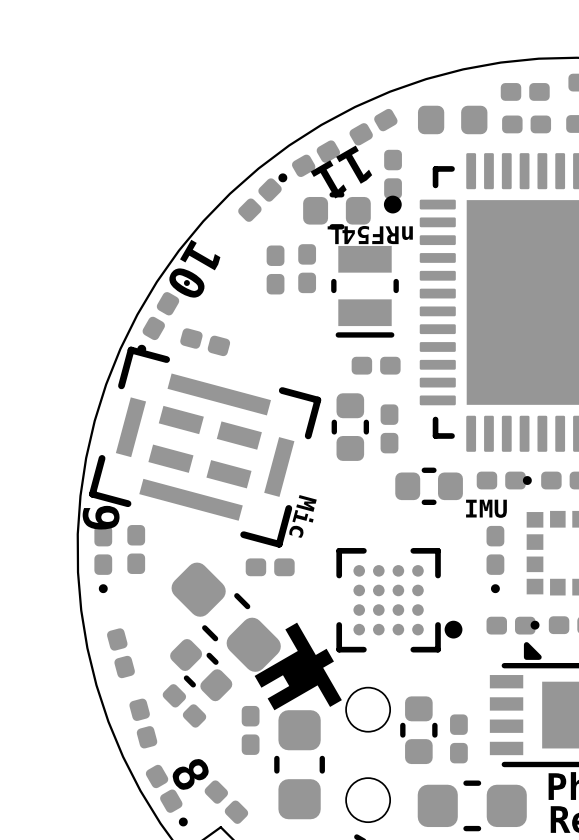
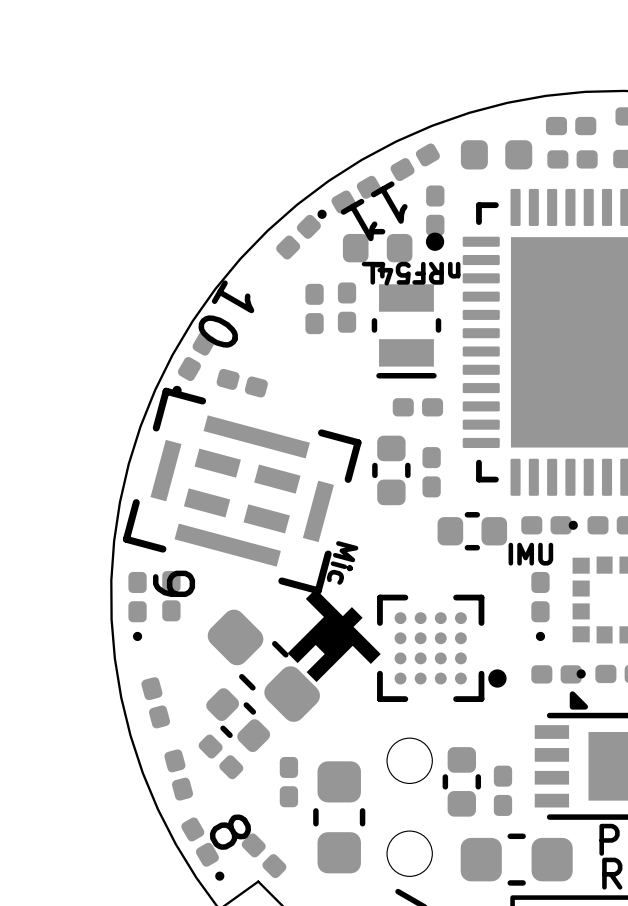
text position: 9 (101, 517) -> 9 (174, 583)
drawing: none -> [287, 589, 381, 683]
part: (270, 567) -> none
drawing: [254, 622, 342, 711] -> none

